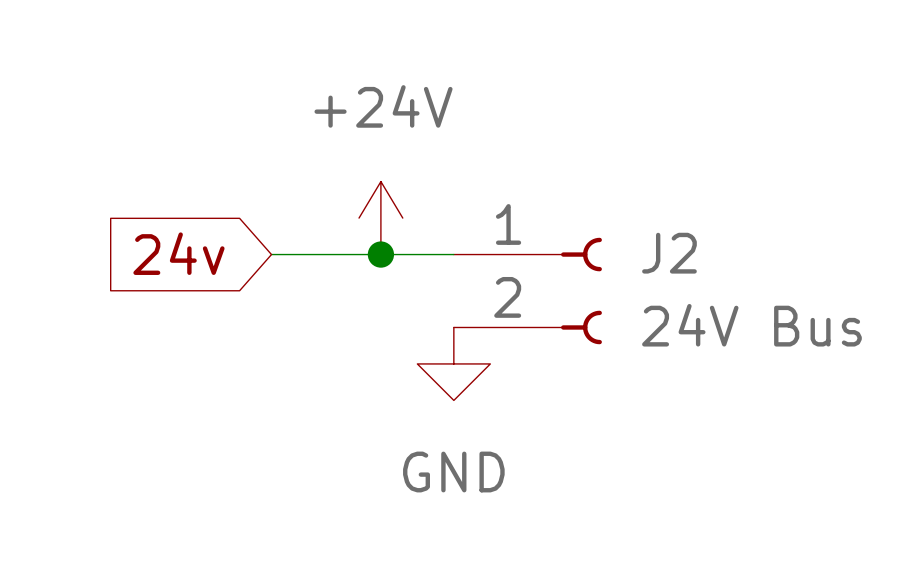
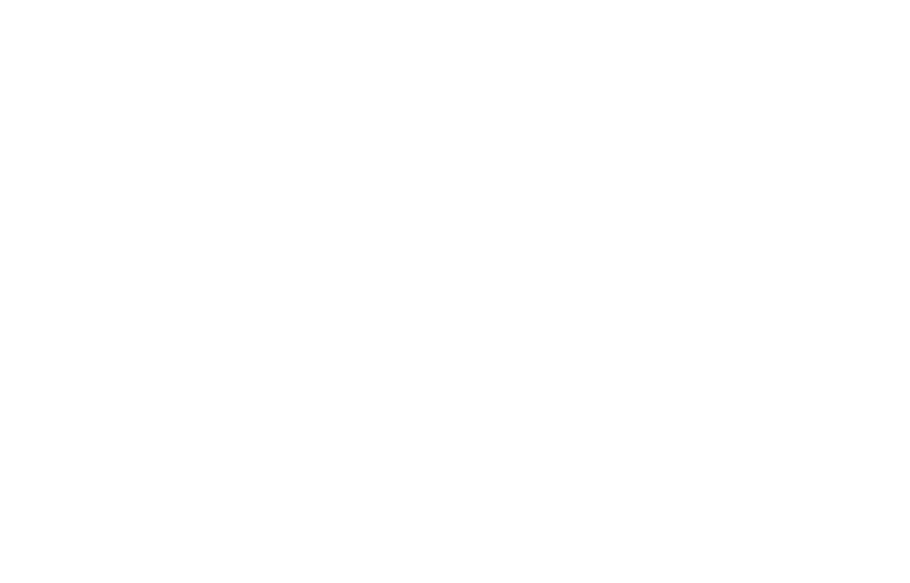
power symbol: +24V (380, 218) -> none
global label: 24v (178, 253) -> none
wire: (271, 254) (453, 254) -> none
junction: (380, 254) -> none
J2: 24V Bus (527, 291) -> none
power symbol: GND (453, 363) -> none

